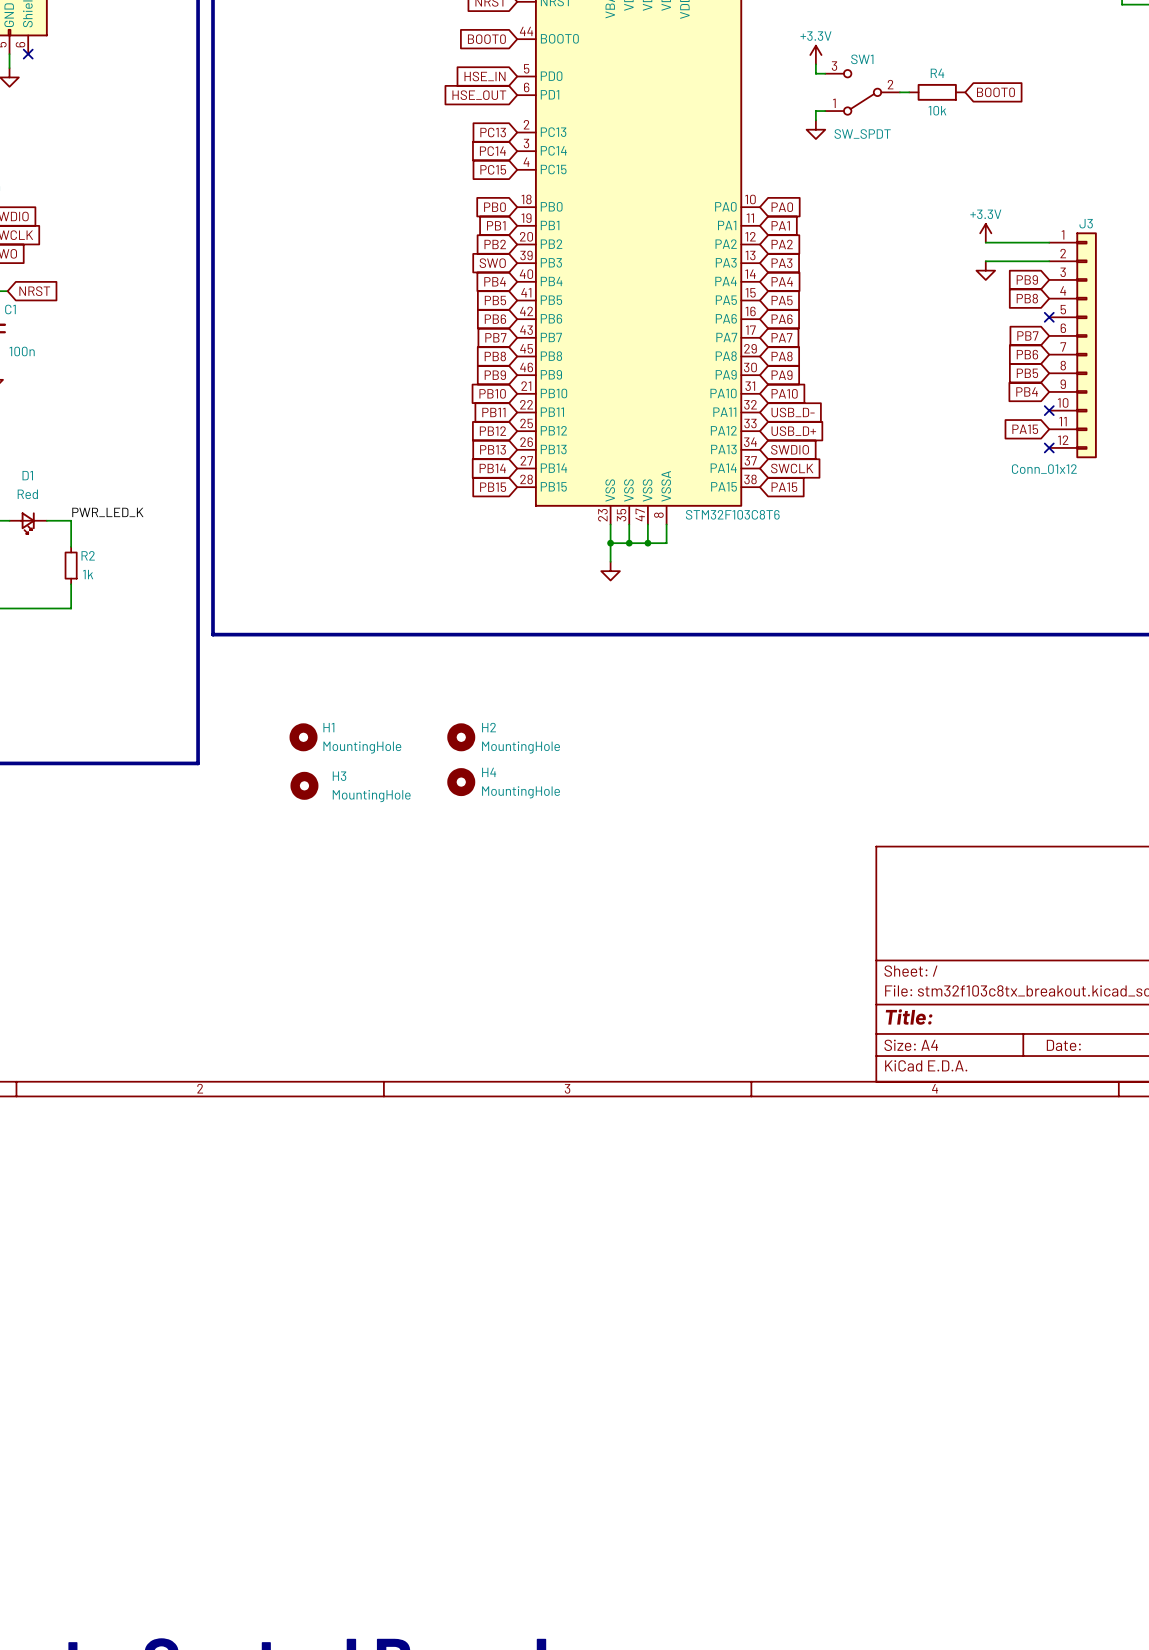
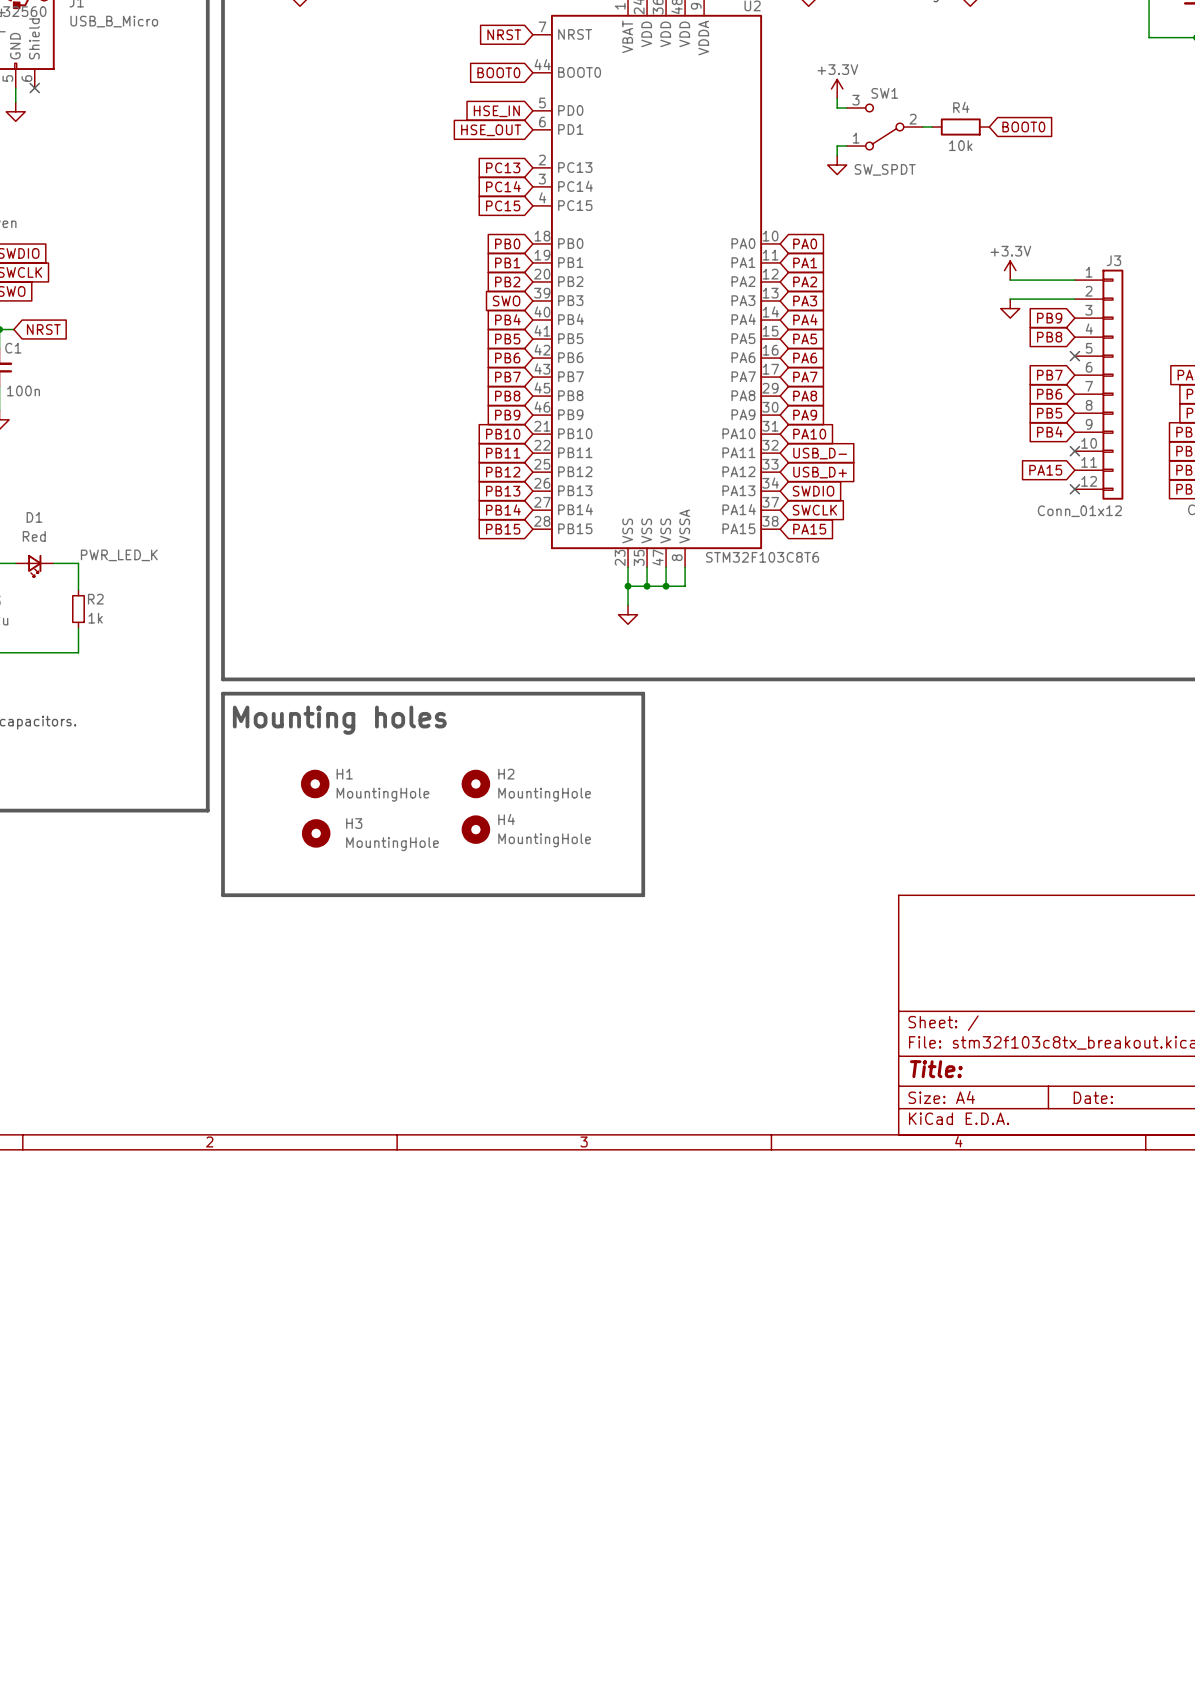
line: none -> (223, 693) (643, 693) (643, 895) (223, 895) (223, 693)
text: none -> Mounting holes (339, 720)

